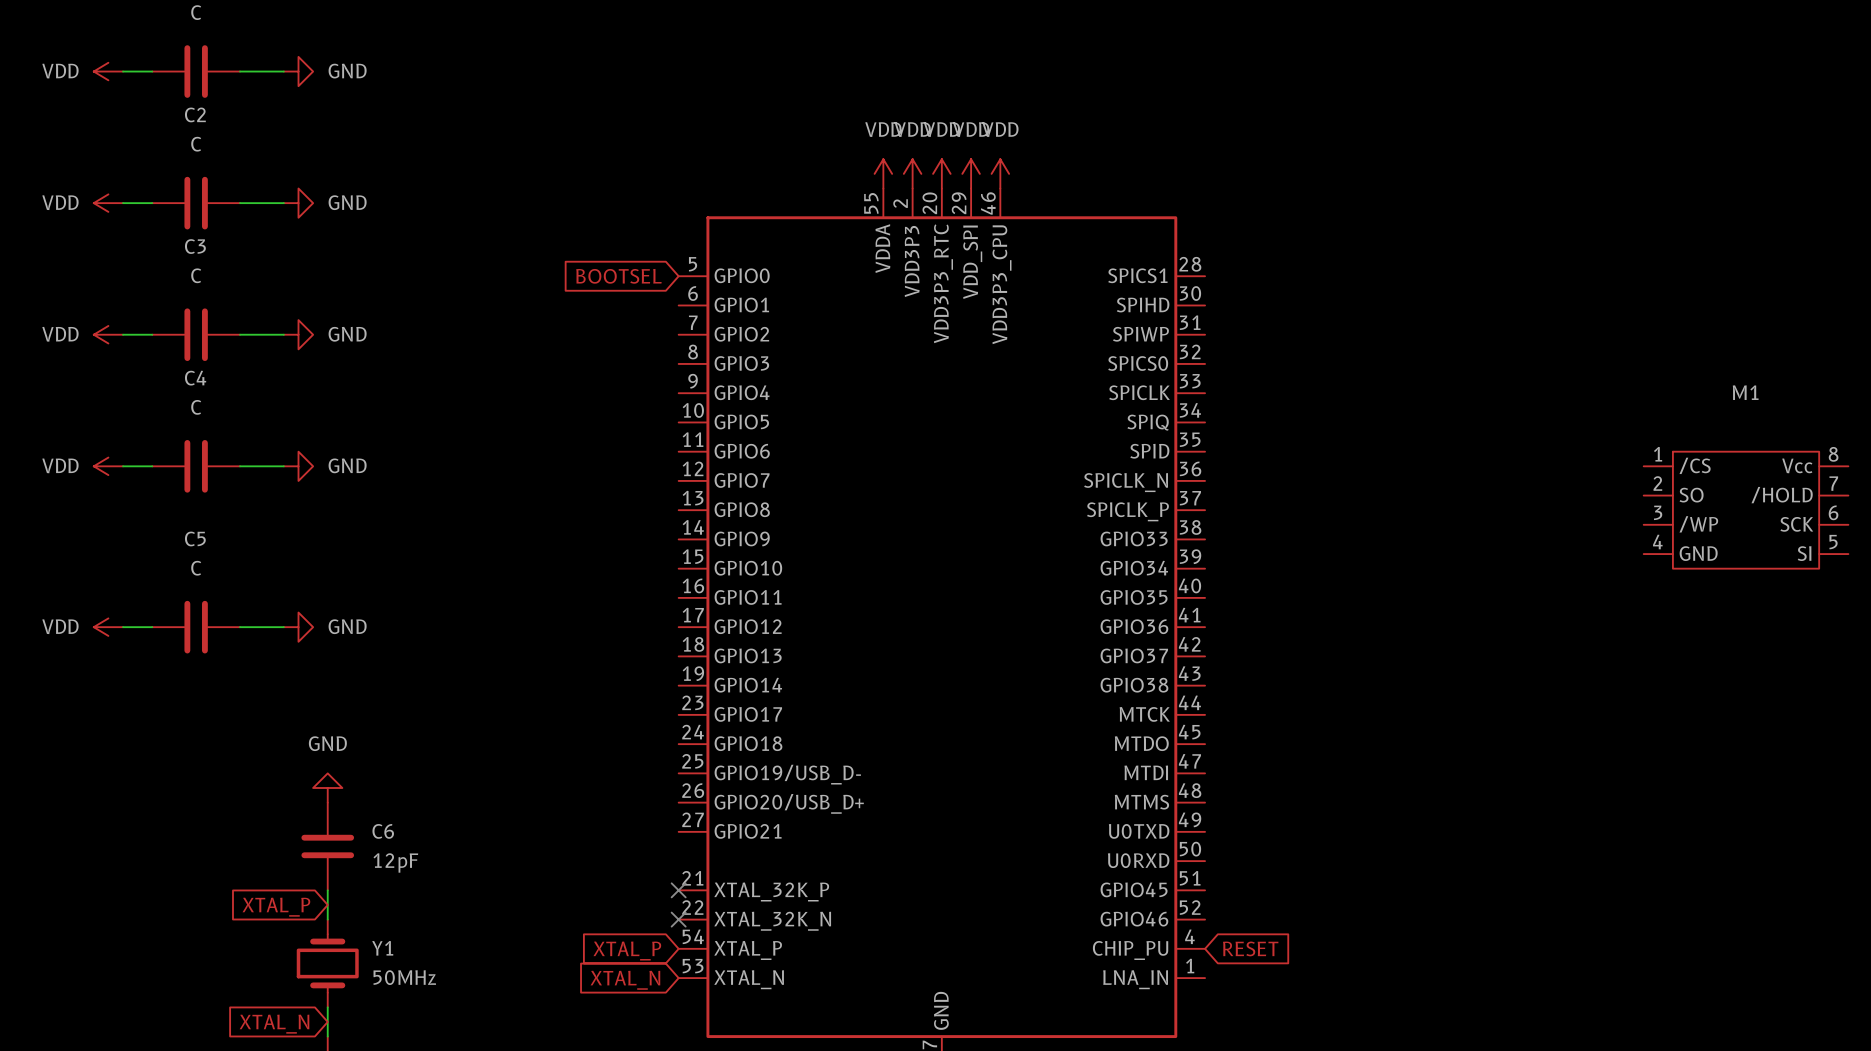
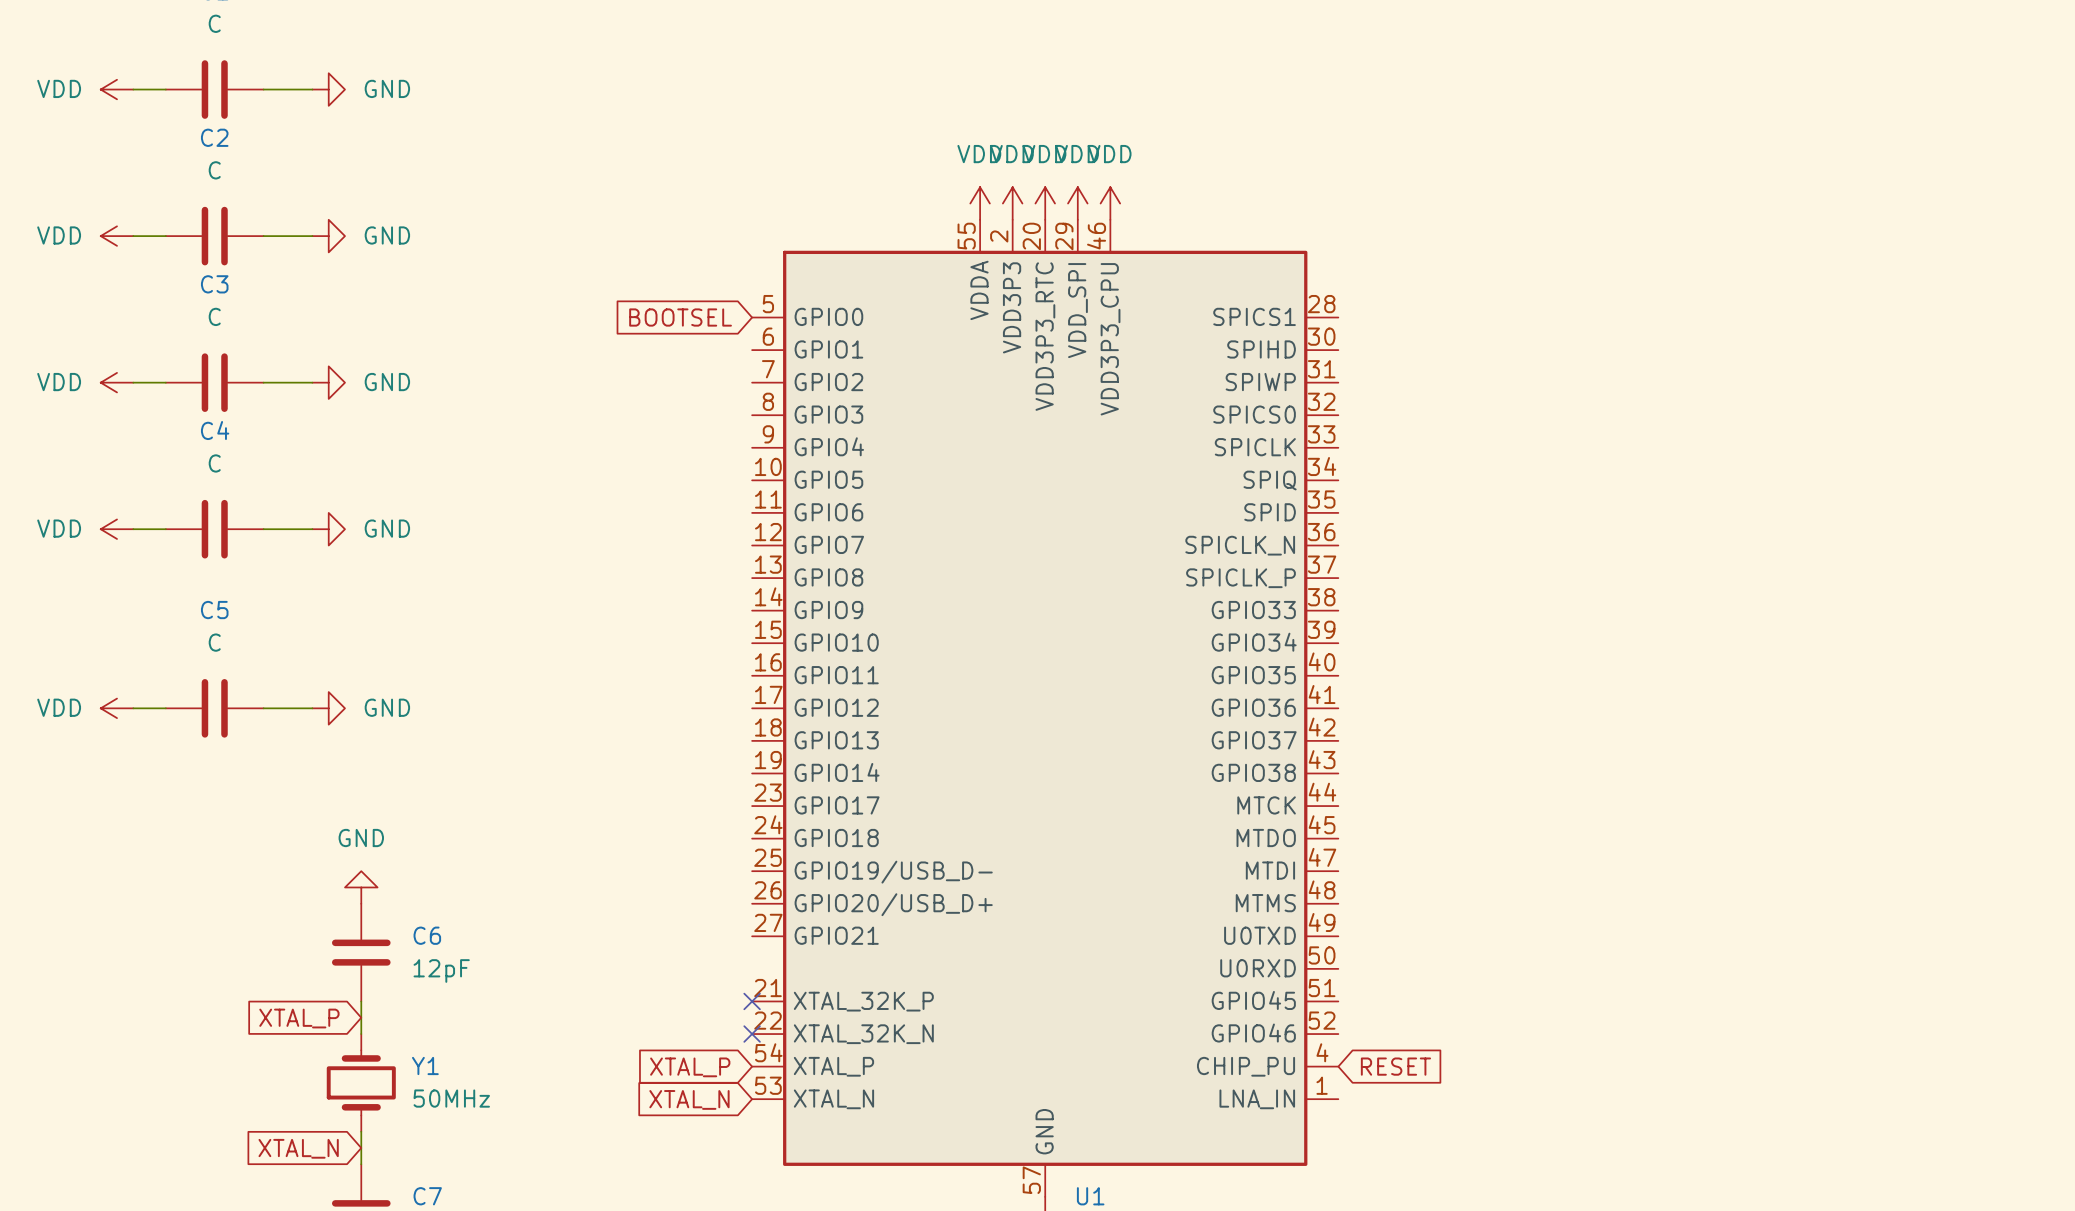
M1: (1746, 510) -> none

